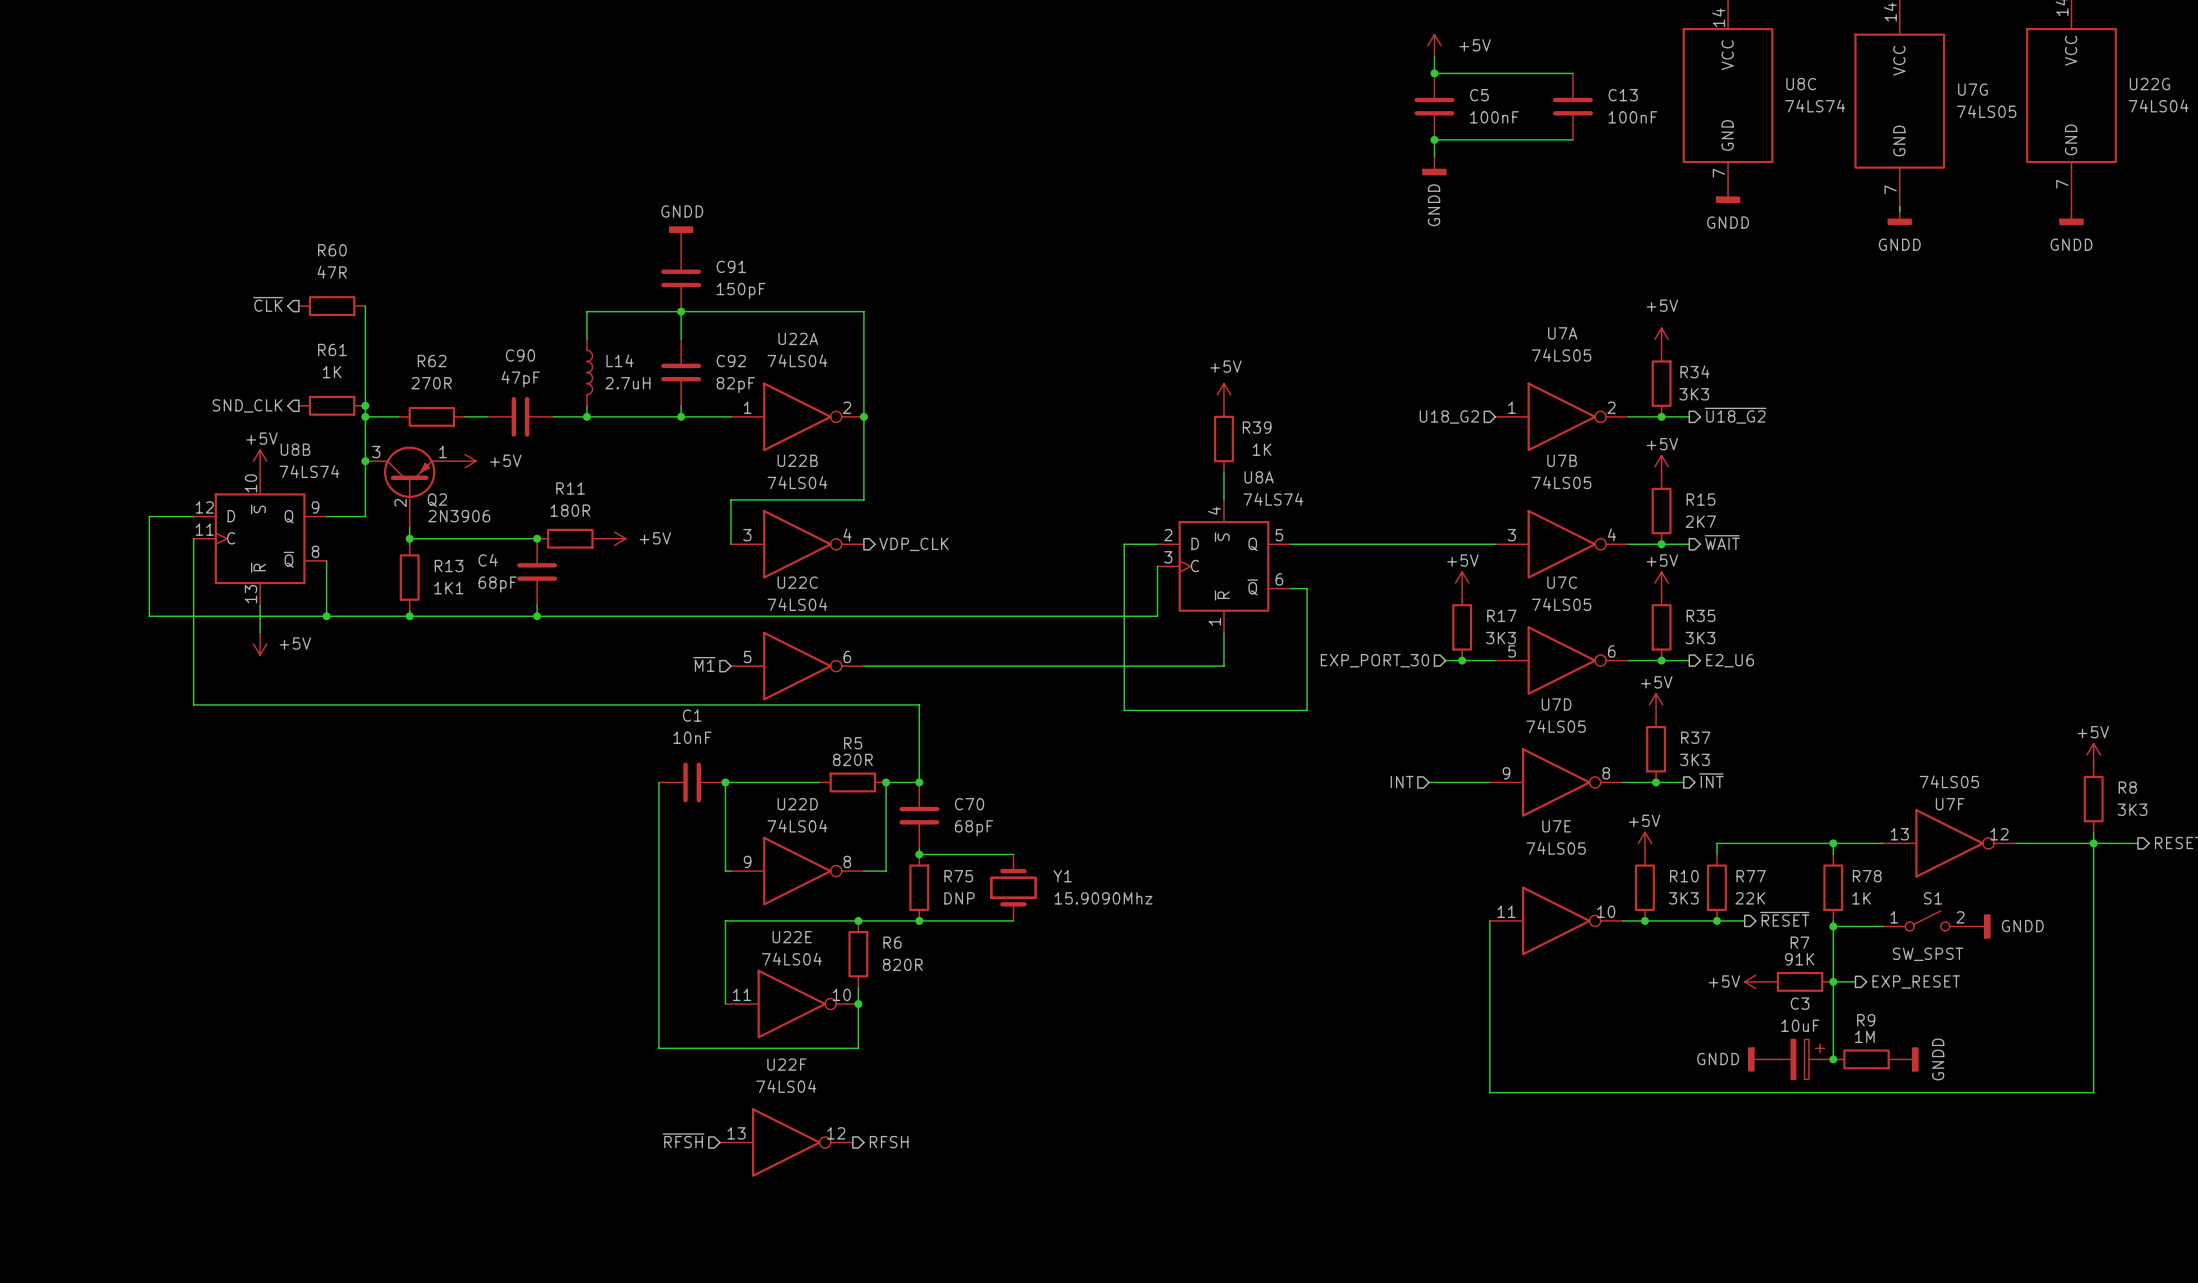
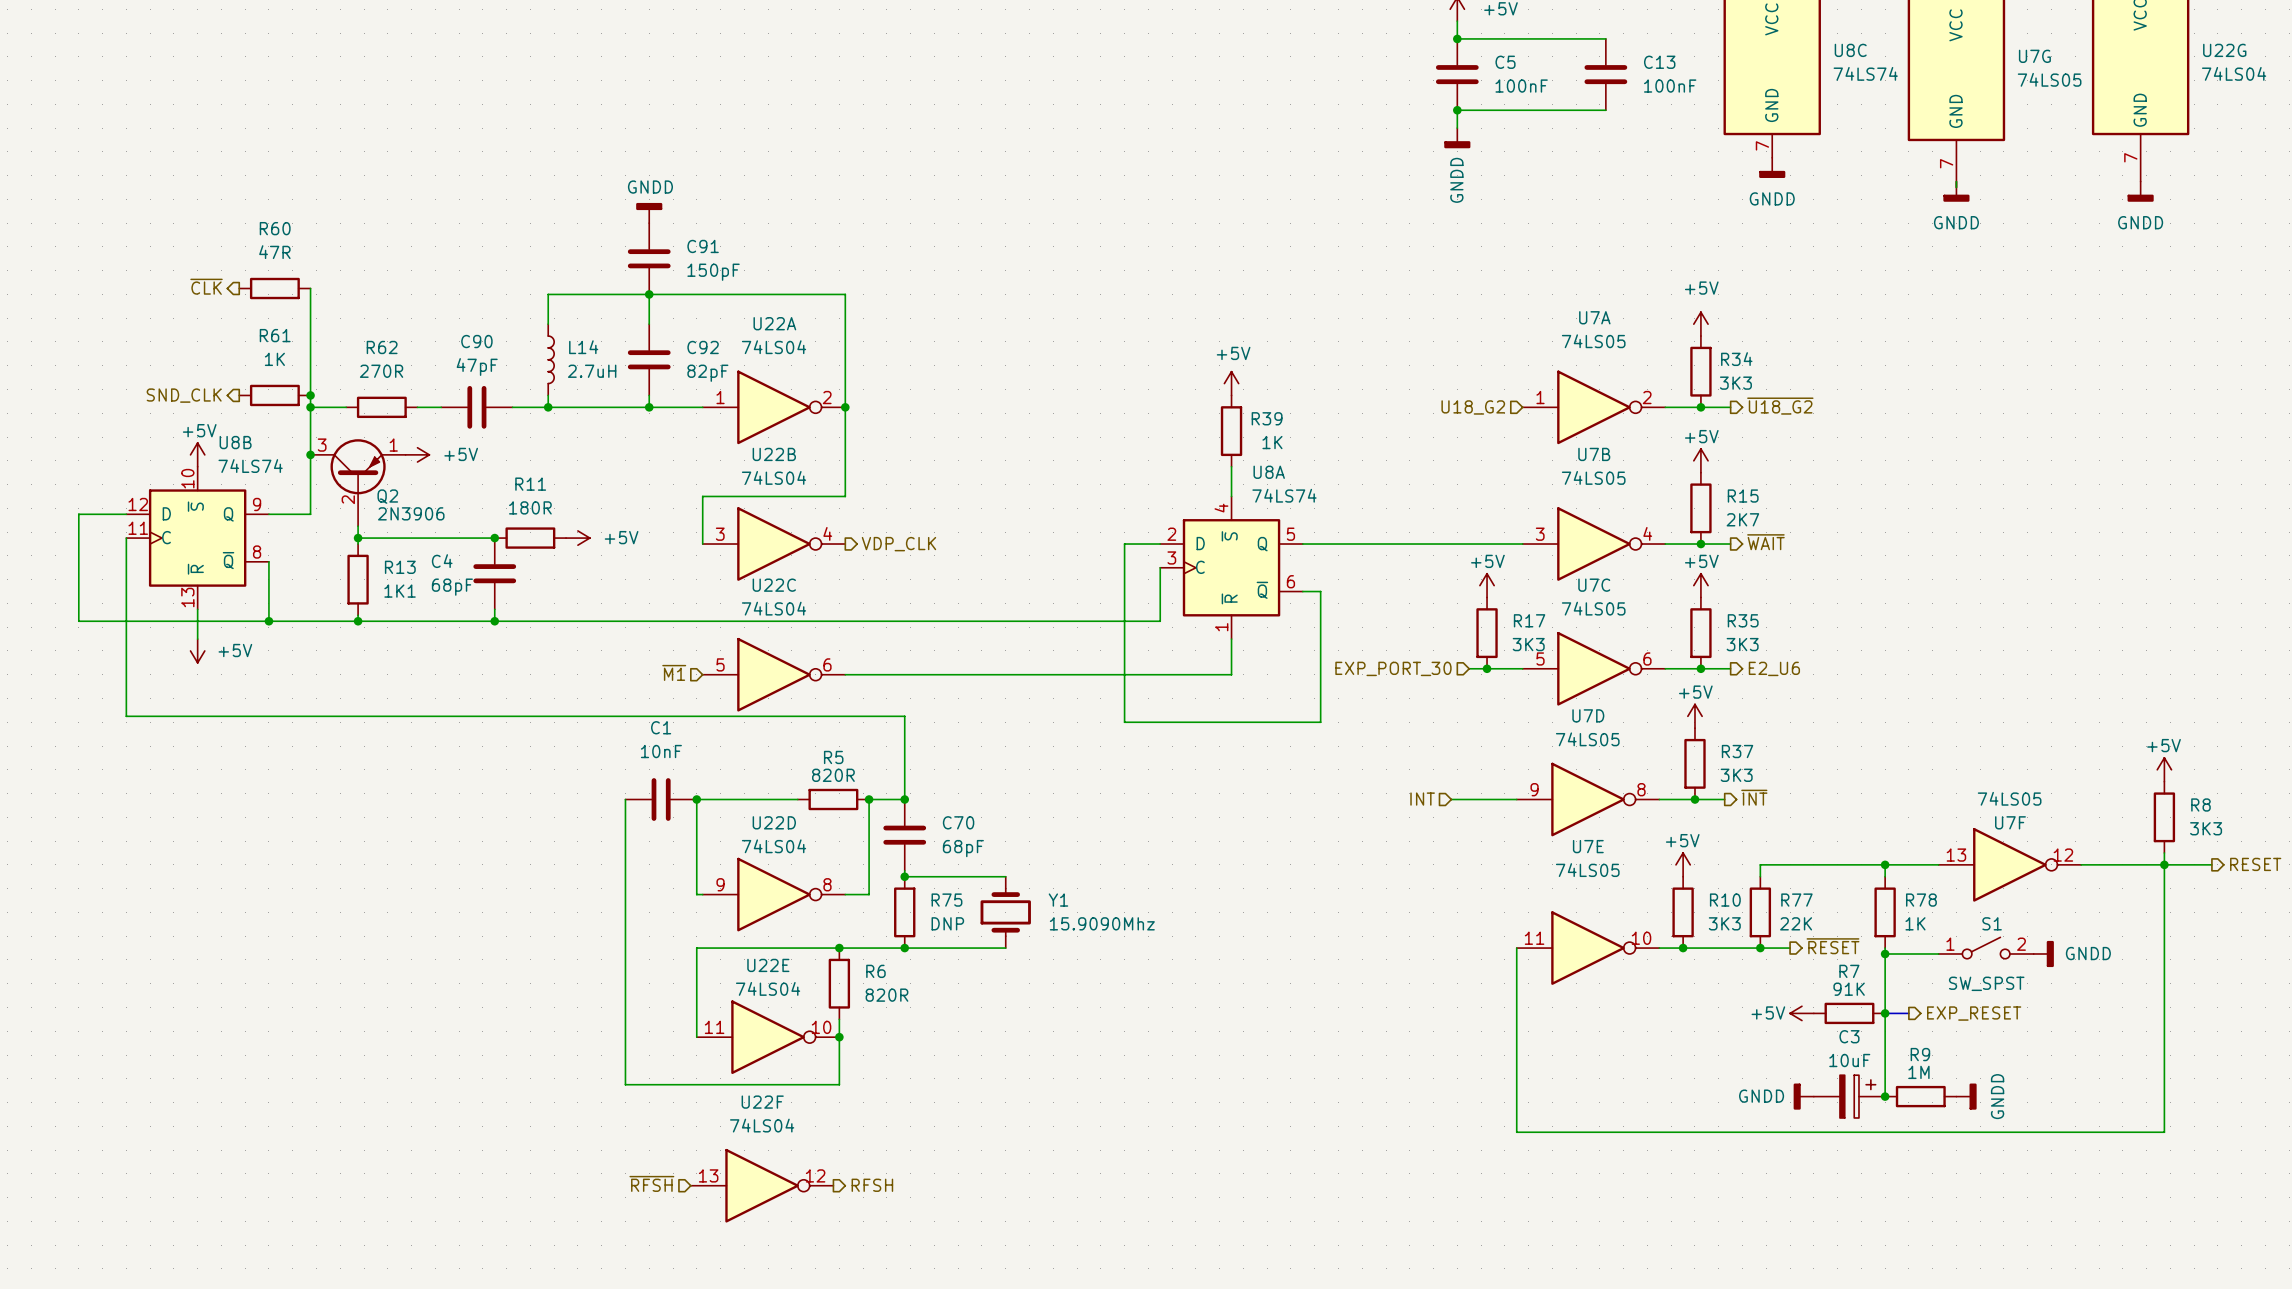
bus: none -> (1885, 1013) (1908, 1013)

